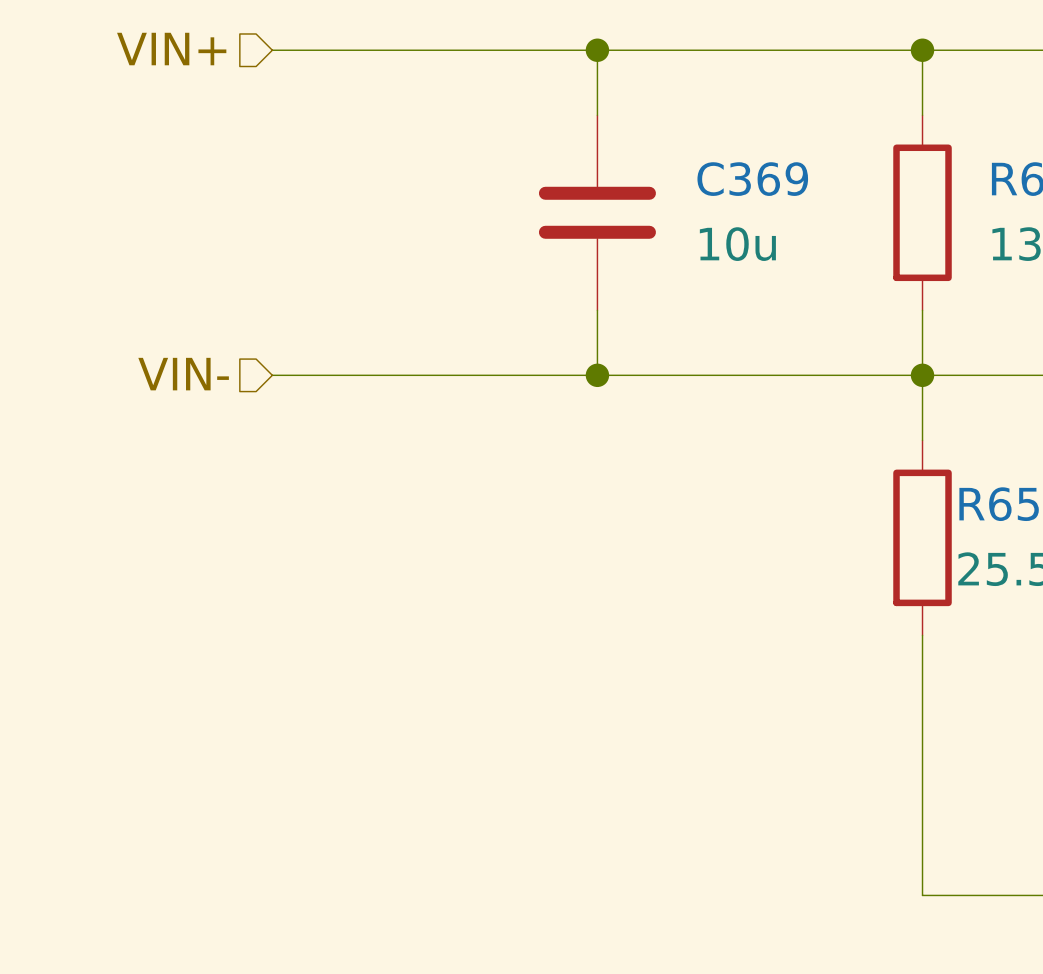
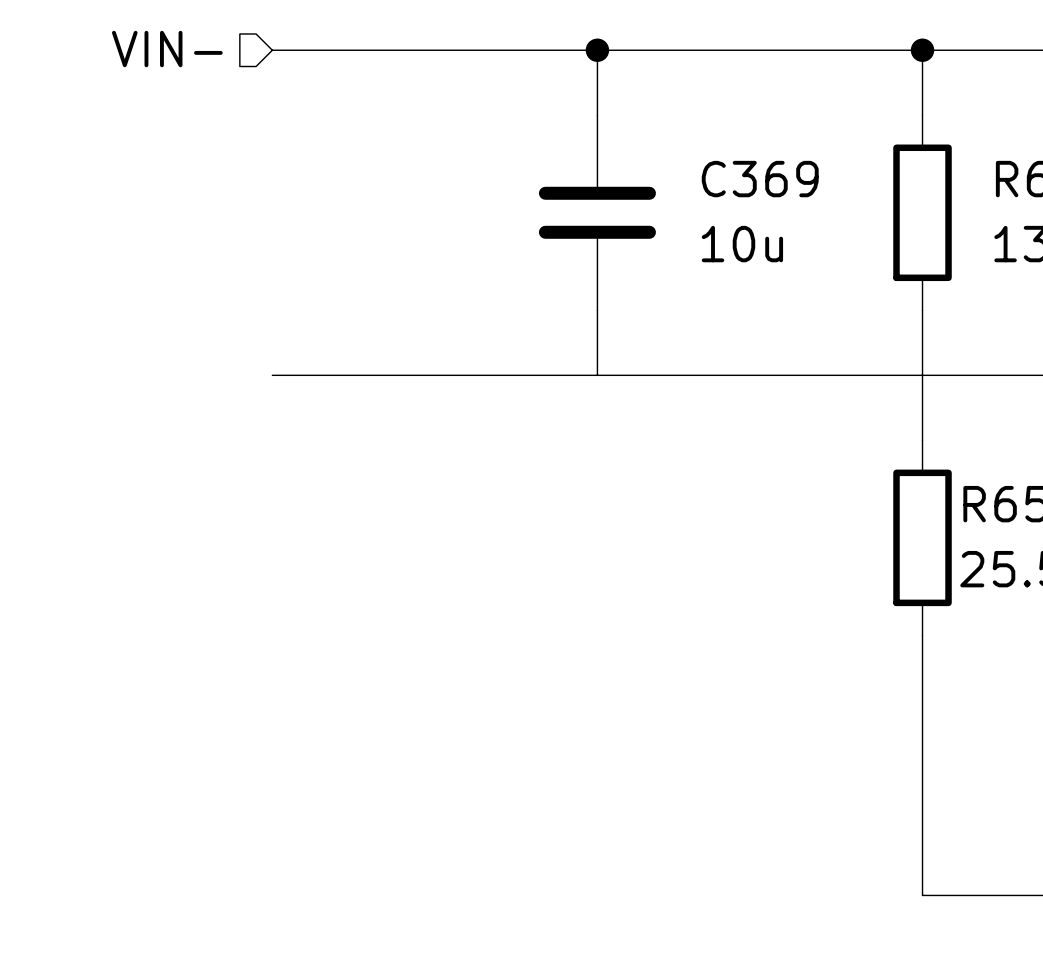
hierarchical label: VIN+ (171, 49) -> VIN- (167, 49)
hierarchical label: VIN- (183, 374) -> none
junction: (597, 375) -> none
junction: (922, 375) -> none

